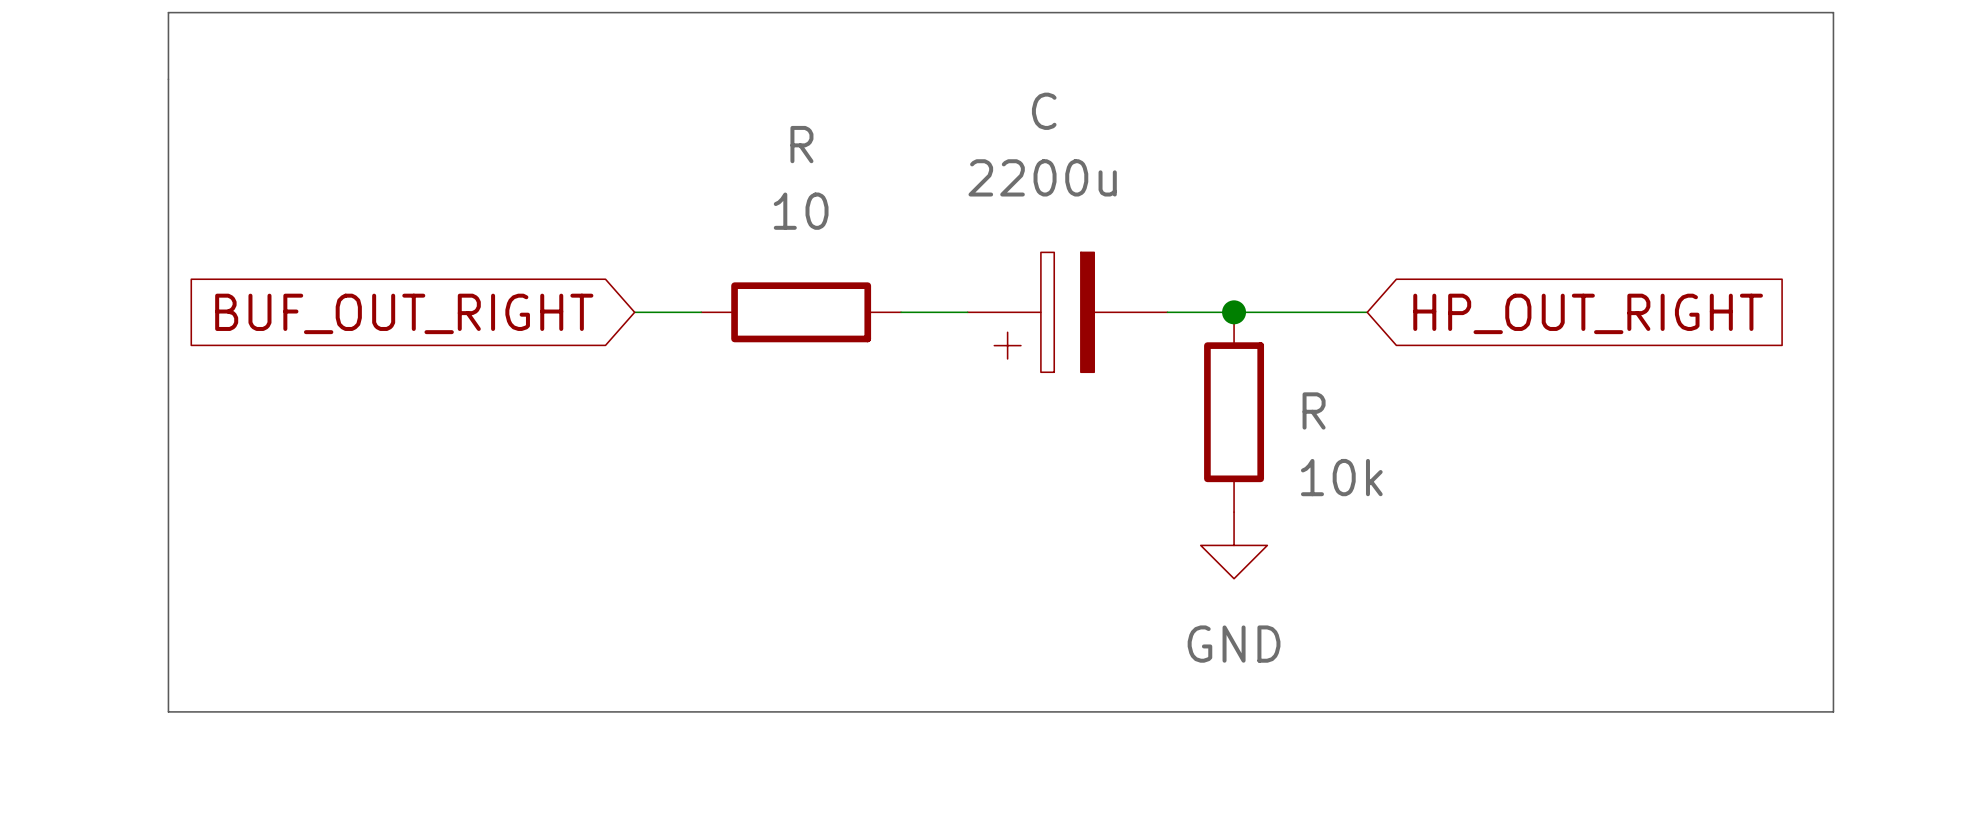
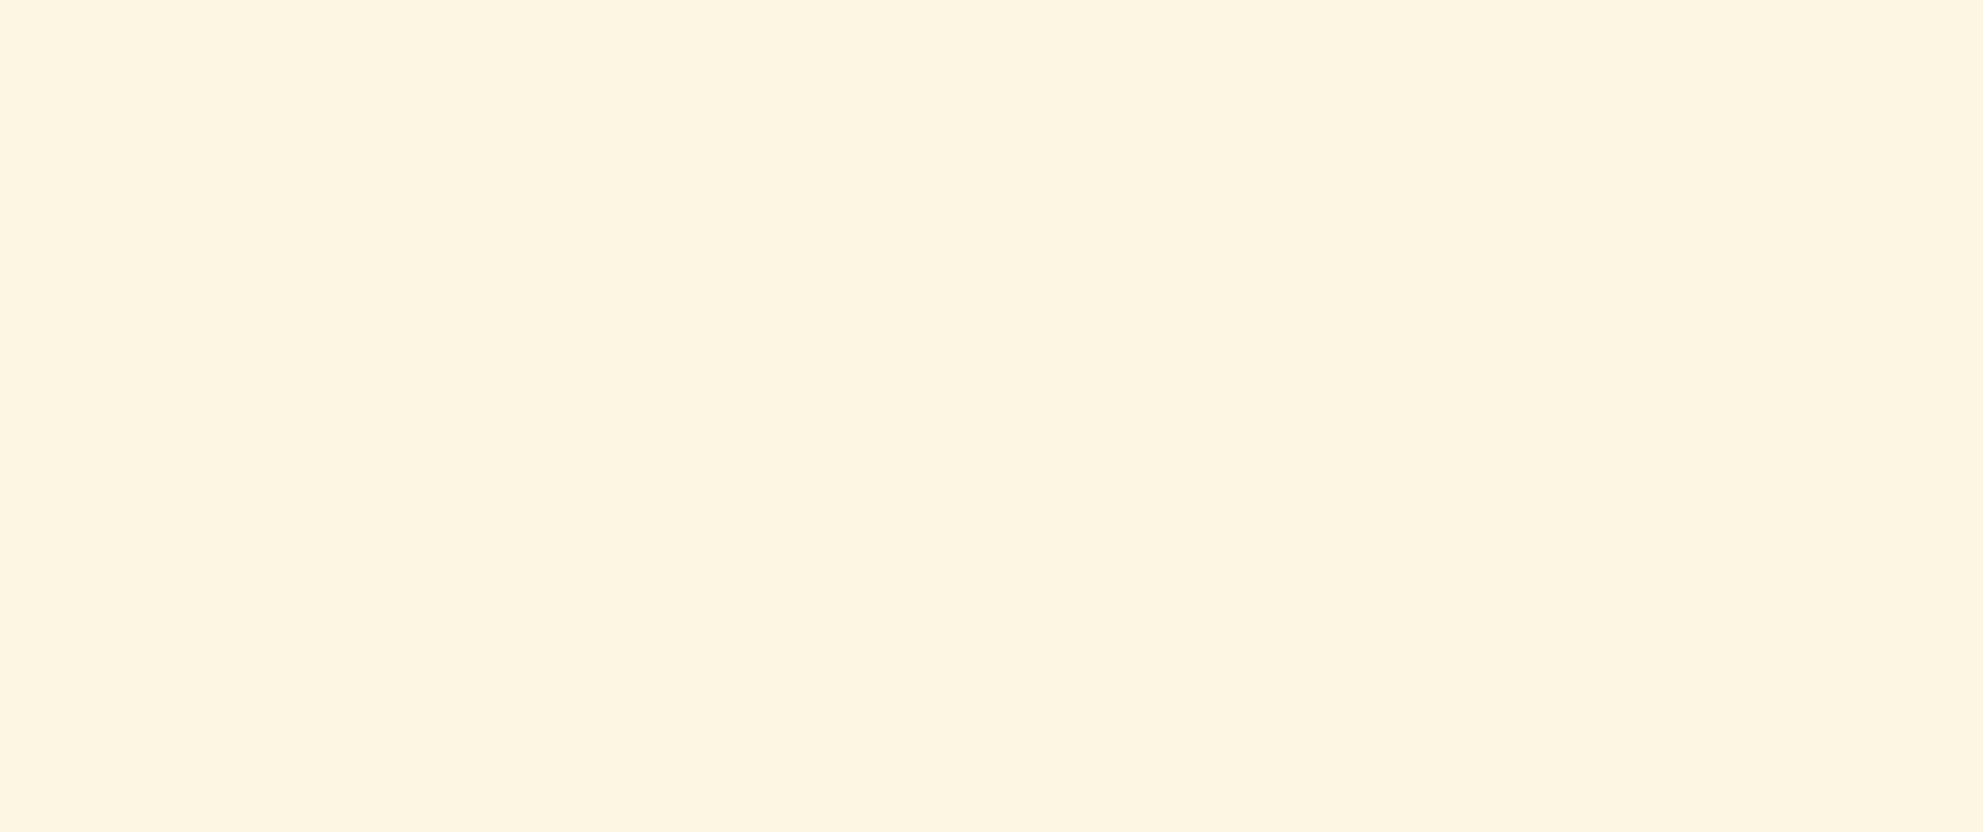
line: (168, 12) (168, 711) (1833, 711) (1833, 12) (168, 12) -> none
wire: (634, 312) (701, 312) -> none
R: 10 (801, 312) -> none
wire: (901, 312) (967, 312) -> none
C: 2200u (1067, 312) -> none
wire: (1167, 312) (1367, 312) -> none
junction: (1234, 312) -> none
global label: BUF_OUT_RIGHT (404, 313) -> none
global label: HP_OUT_RIGHT (1588, 313) -> none
R: 10k (1234, 412) -> none
power symbol: GND (1234, 545) -> none

